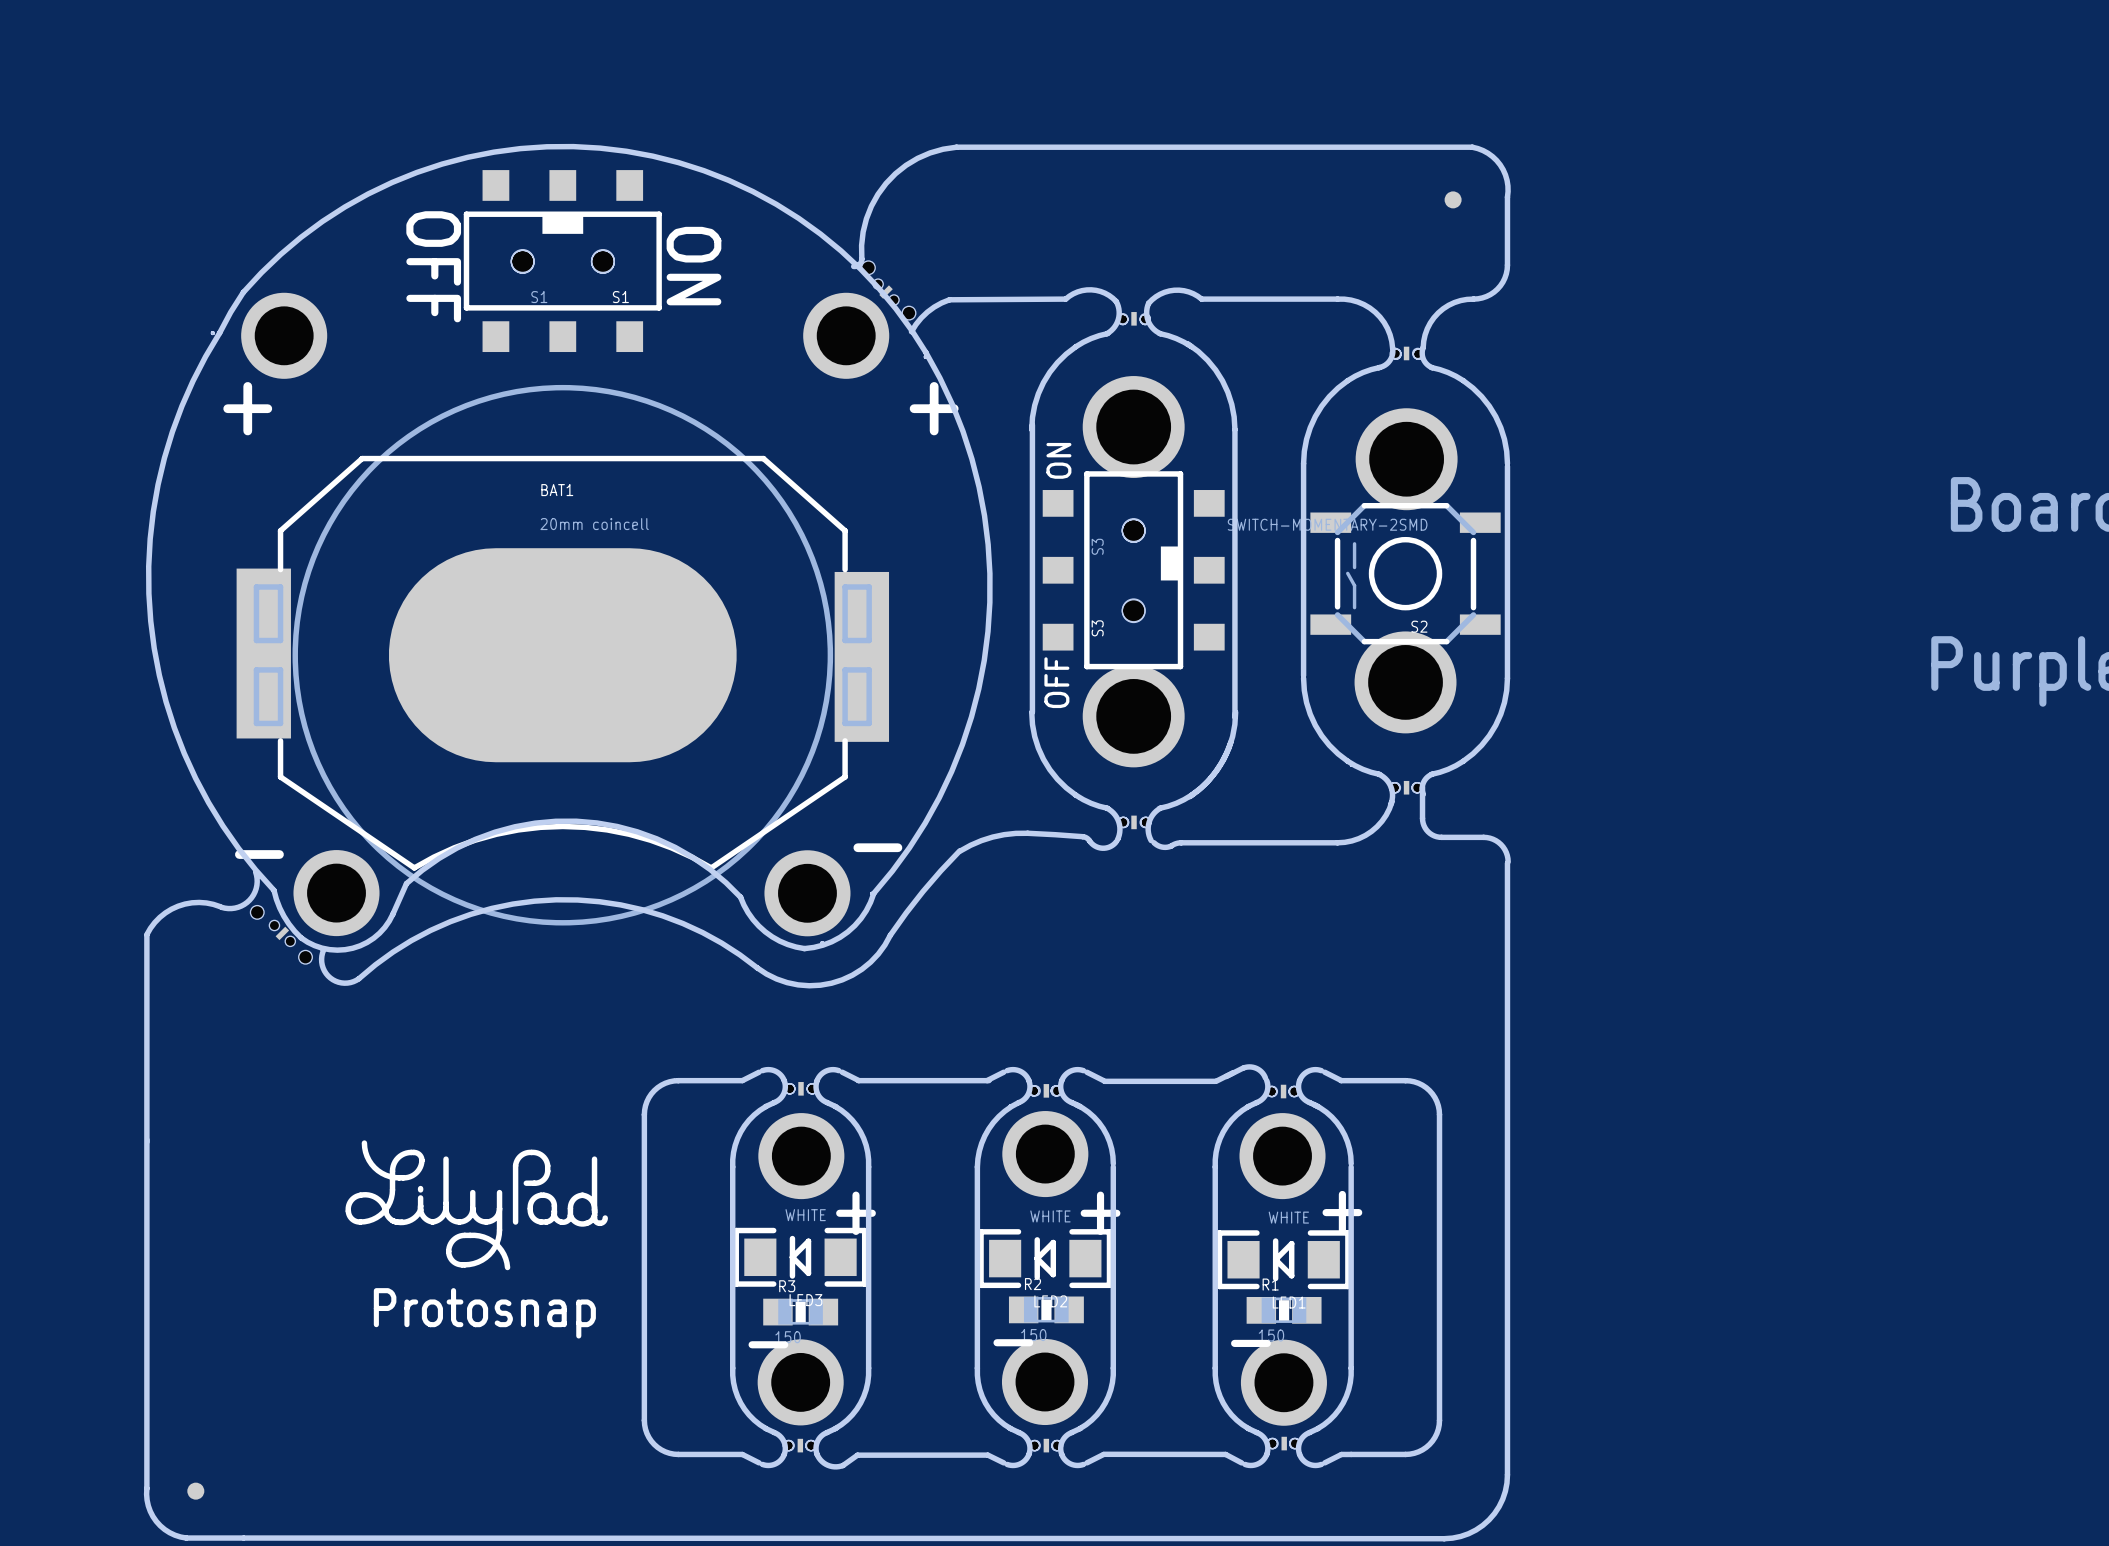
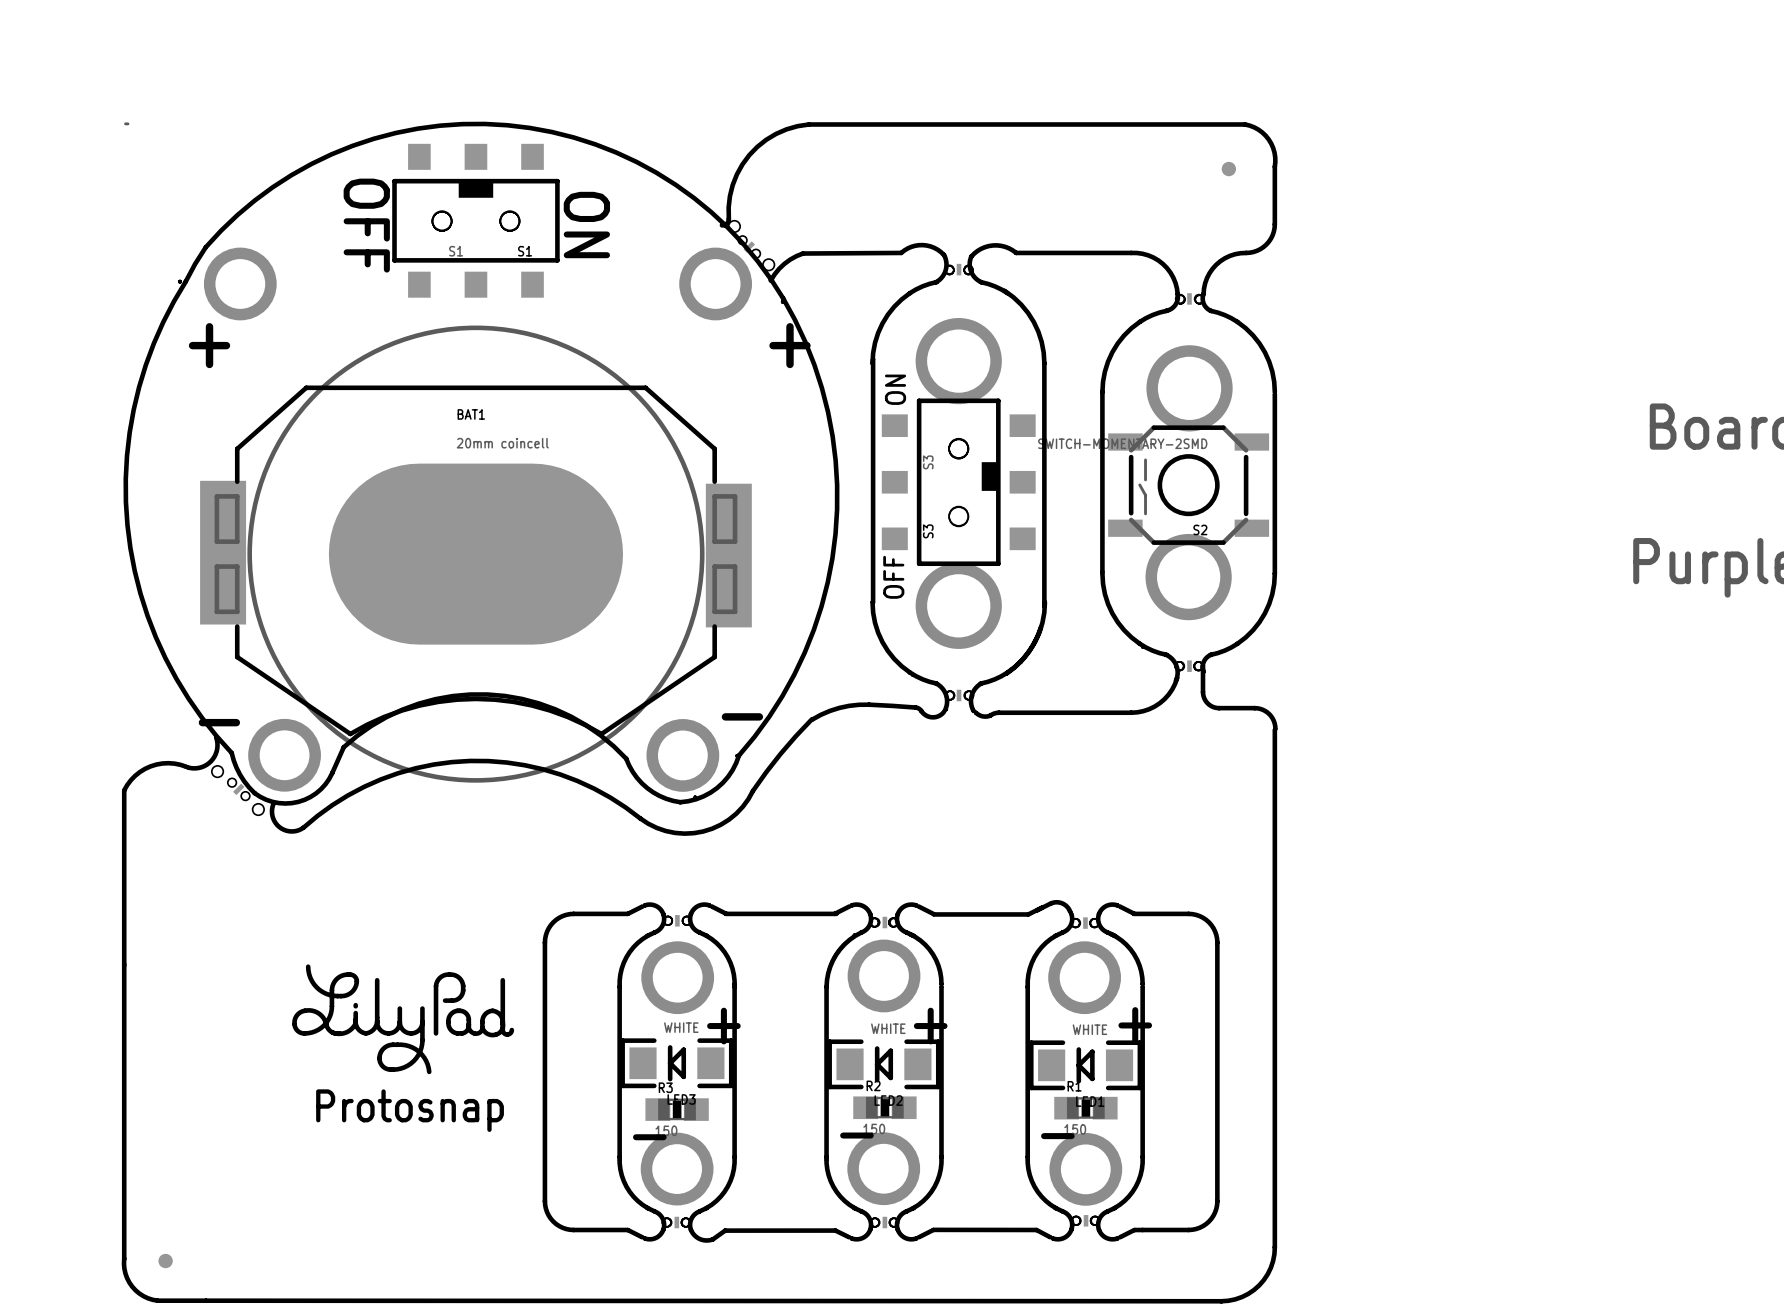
line: none -> (125, 123) (127, 123)

